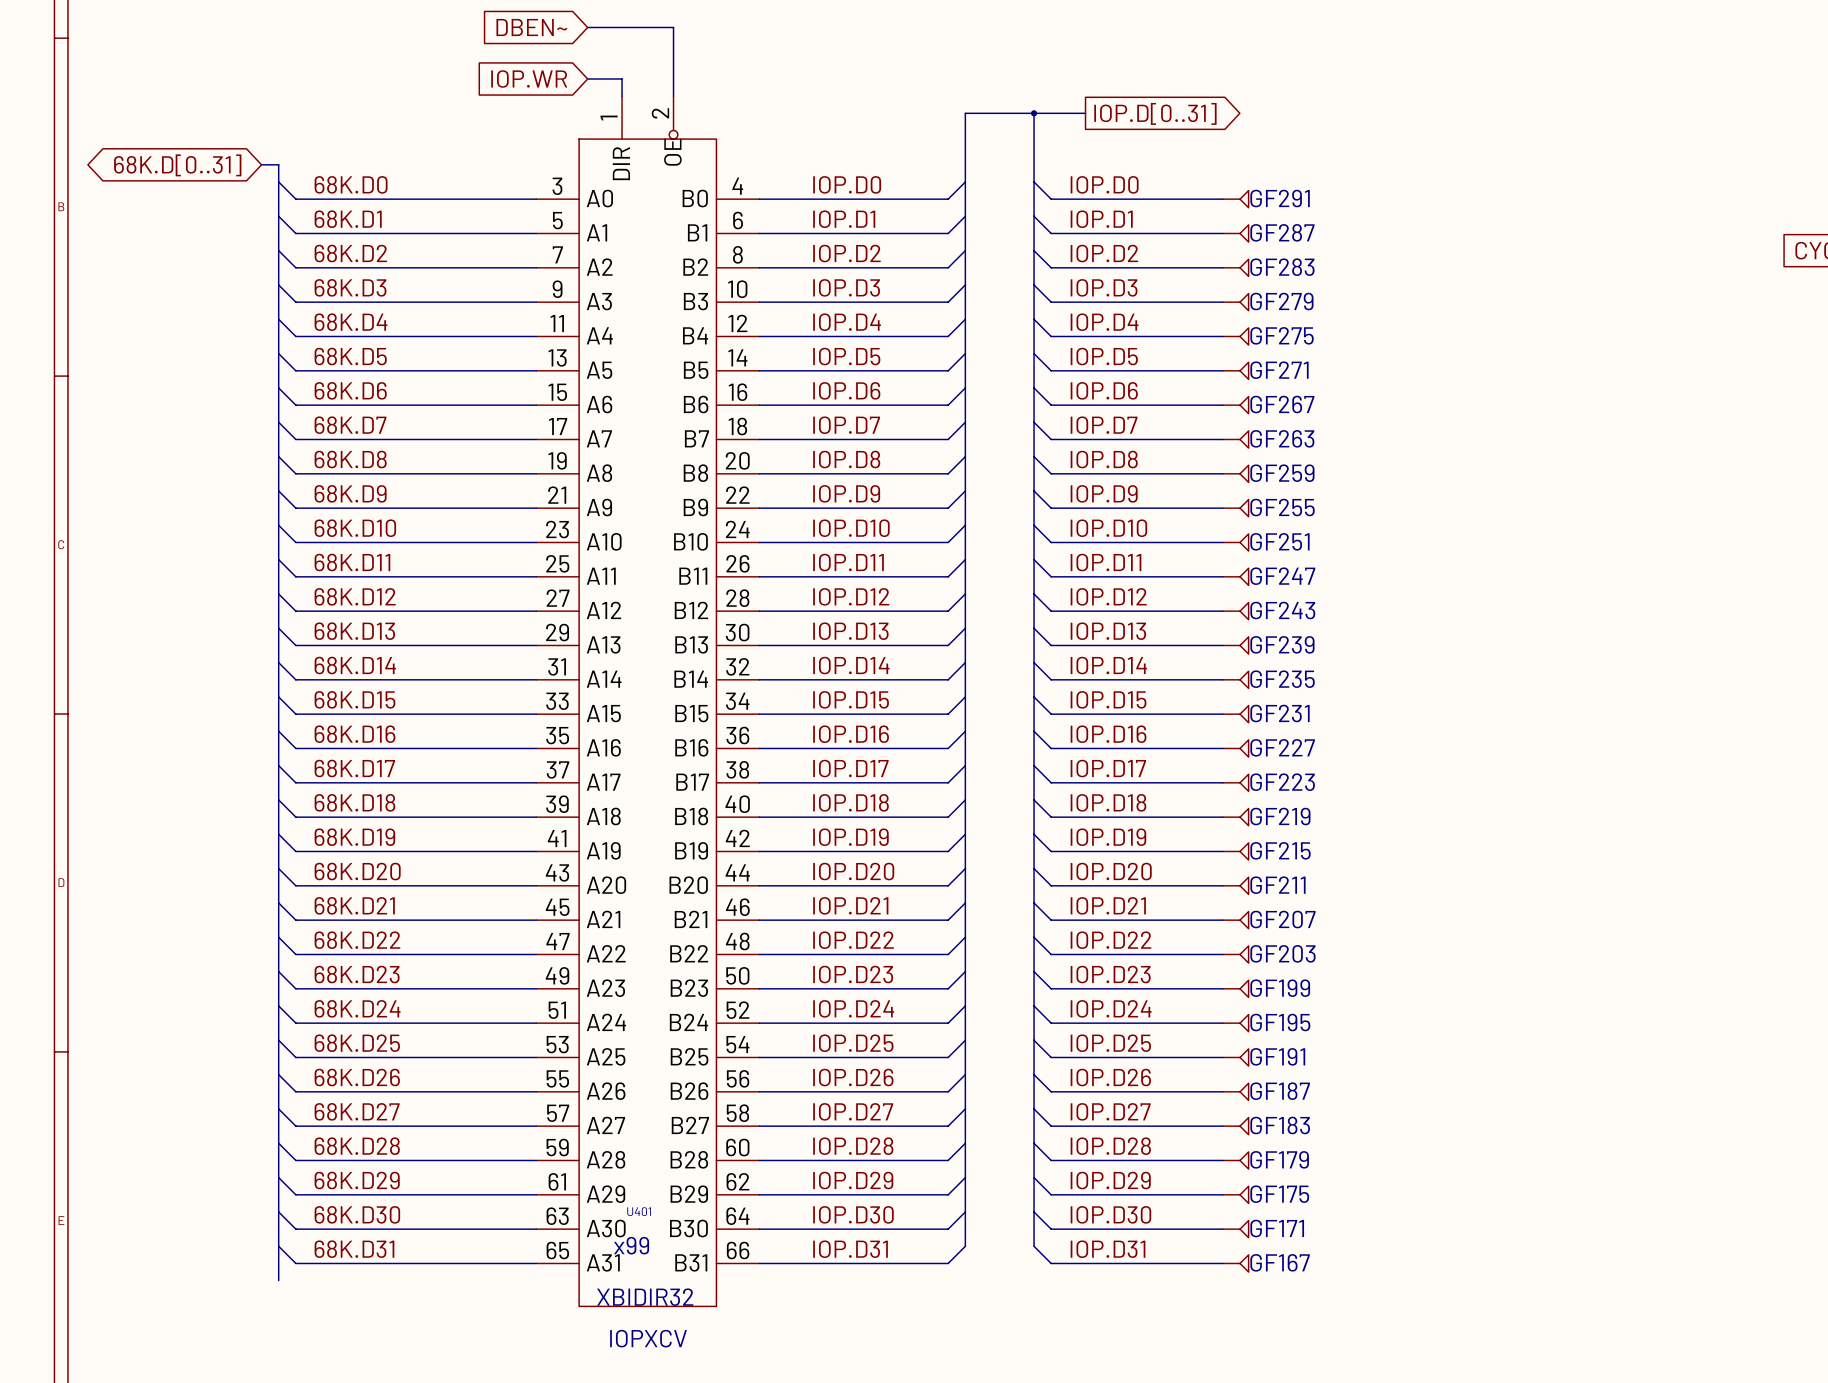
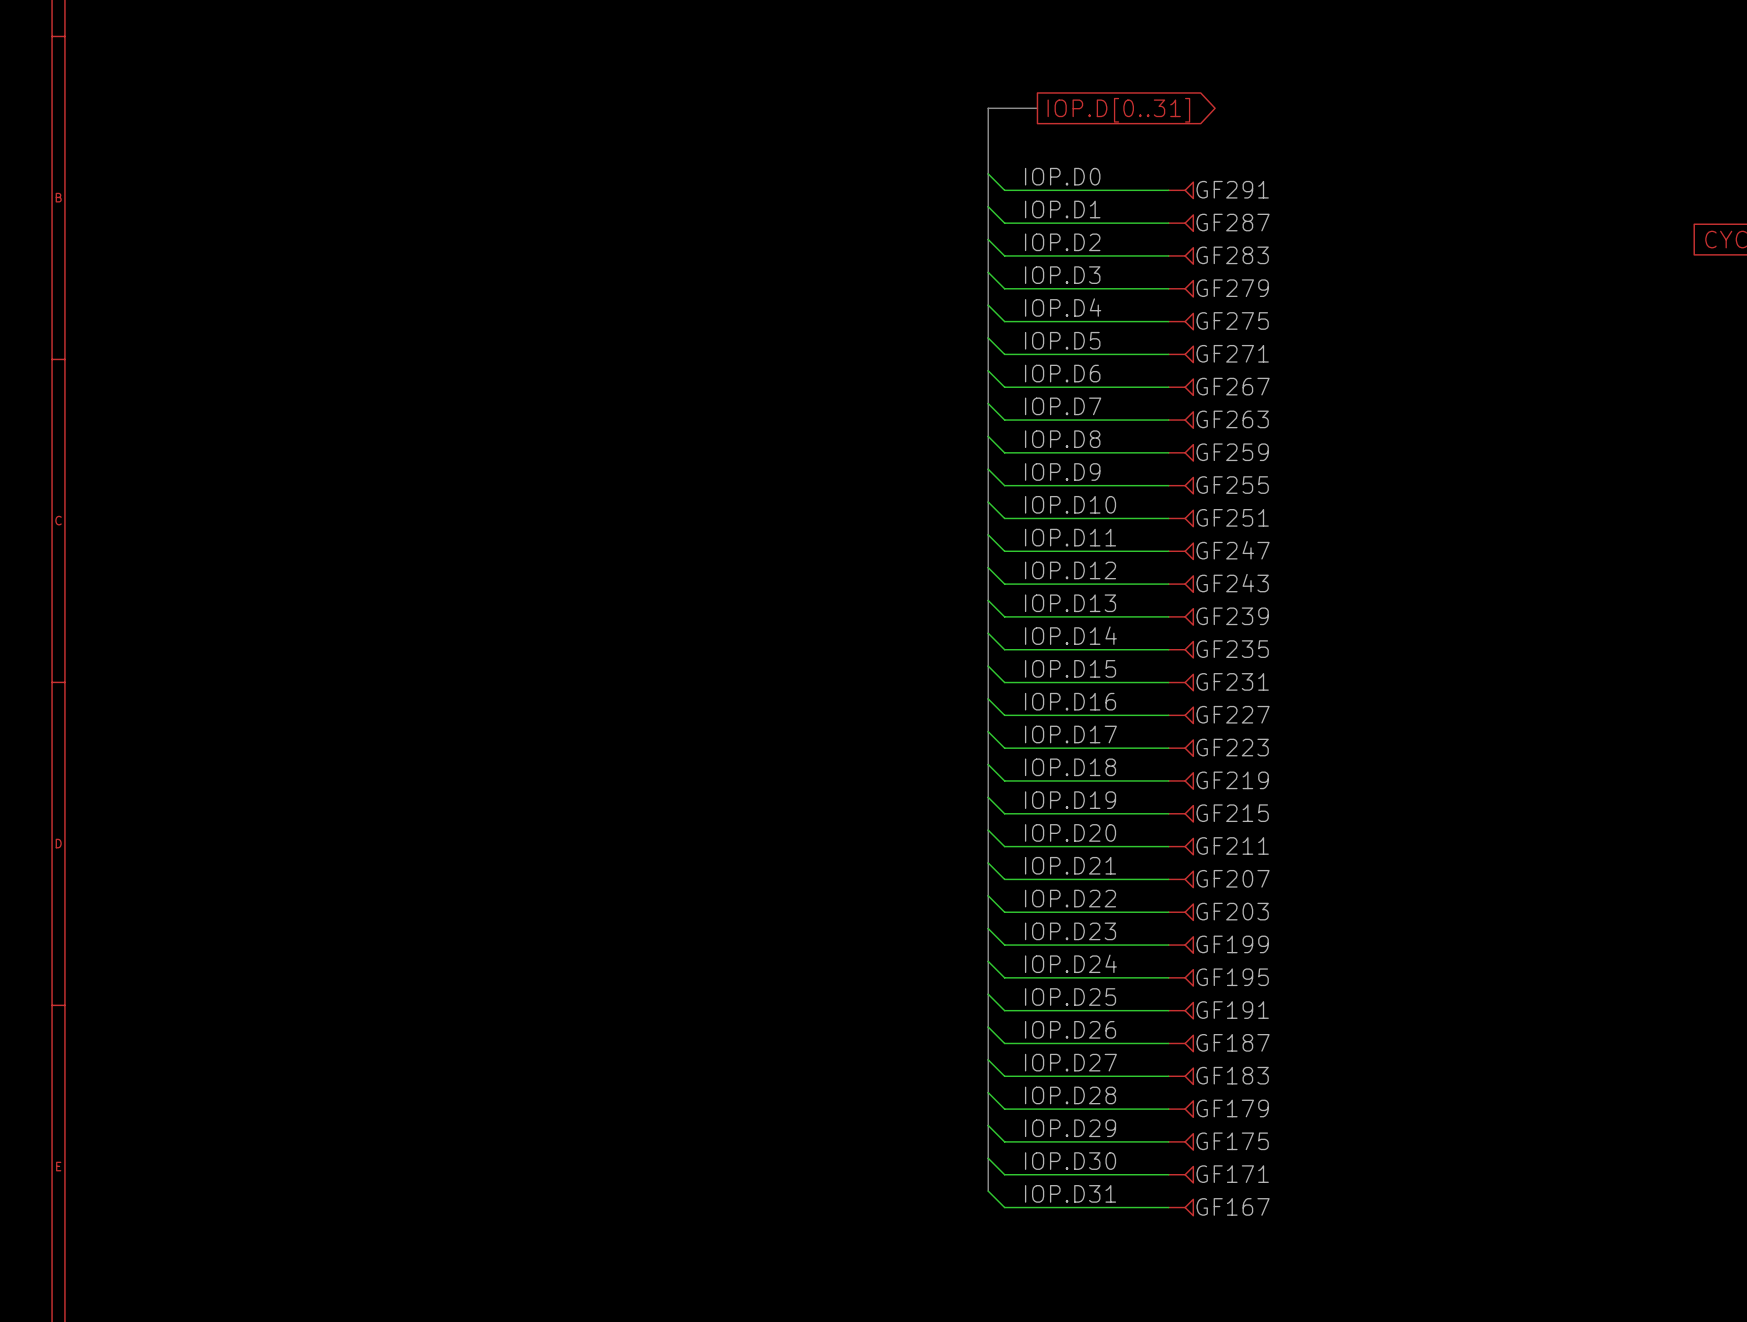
global label: DBEN~ (531, 27) -> none
wire: (587, 27) (673, 27) (673, 96) -> none
global label: IOP.WR (529, 78) -> none
wire: (587, 78) (622, 78) (622, 96) -> none
bus: (1034, 113) (965, 113) (965, 1246) -> none
junction: (1034, 113) -> none
bus: (261, 164) (278, 164) (278, 1280) -> none
global label: 68K.D[0..31] (177, 165) -> none
wire: (278, 181) (295, 199) (536, 199) -> none
wire: (965, 181) (948, 199) (759, 199) -> none
label: 68K.D0 (351, 184) -> none
label: IOP.D0 (847, 184) -> none
wire: (278, 216) (295, 233) (536, 233) -> none
wire: (965, 216) (948, 233) (759, 233) -> none
label: 68K.D1 (348, 219) -> none
label: IOP.D1 (844, 219) -> none
wire: (278, 250) (295, 267) (536, 267) -> none
wire: (965, 250) (948, 267) (759, 267) -> none
label: 68K.D2 (350, 253) -> none
label: IOP.D2 (846, 253) -> none
wire: (278, 284) (295, 302) (536, 302) -> none
wire: (965, 284) (948, 302) (759, 302) -> none
label: 68K.D3 (350, 287) -> none
label: IOP.D3 (846, 287) -> none
wire: (278, 319) (295, 336) (536, 336) -> none
wire: (965, 319) (948, 336) (759, 336) -> none
label: 68K.D4 (351, 322) -> none
label: IOP.D4 (847, 322) -> none
wire: (278, 353) (295, 370) (536, 370) -> none
wire: (965, 353) (948, 370) (759, 370) -> none
label: 68K.D5 (350, 356) -> none
label: IOP.D5 (846, 356) -> none
wire: (278, 387) (295, 405) (536, 405) -> none
wire: (965, 387) (948, 405) (759, 405) -> none
label: 68K.D6 (350, 390) -> none
label: IOP.D6 (846, 390) -> none
wire: (278, 422) (295, 439) (536, 439) -> none
wire: (965, 422) (948, 439) (759, 439) -> none
label: 68K.D7 (350, 425) -> none
label: IOP.D7 (846, 425) -> none
wire: (278, 456) (295, 473) (536, 473) -> none
wire: (965, 456) (948, 473) (759, 473) -> none
label: 68K.D8 (350, 459) -> none
label: IOP.D8 (846, 459) -> none
wire: (278, 490) (295, 508) (536, 508) -> none
wire: (965, 490) (948, 508) (759, 508) -> none
label: 68K.D9 (350, 493) -> none
label: IOP.D9 (846, 493) -> none
wire: (278, 525) (295, 542) (536, 542) -> none
wire: (965, 525) (948, 542) (759, 542) -> none
label: 68K.D10 (355, 528) -> none
label: IOP.D10 (851, 528) -> none
wire: (278, 559) (295, 576) (536, 576) -> none
wire: (965, 559) (948, 576) (759, 576) -> none
label: 68K.D11 (352, 562) -> none
label: IOP.D11 (848, 562) -> none
wire: (278, 593) (295, 611) (536, 611) -> none
wire: (965, 593) (948, 611) (759, 611) -> none
label: 68K.D12 (355, 596) -> none
label: IOP.D12 (851, 596) -> none
wire: (278, 628) (295, 645) (536, 645) -> none
wire: (965, 628) (948, 645) (759, 645) -> none
label: 68K.D13 (354, 631) -> none
label: IOP.D13 (850, 631) -> none
wire: (278, 662) (295, 679) (536, 679) -> none
wire: (965, 662) (948, 679) (759, 679) -> none
label: 68K.D14 (355, 665) -> none
label: IOP.D14 (851, 665) -> none
wire: (278, 696) (295, 714) (536, 714) -> none
wire: (965, 696) (948, 714) (759, 714) -> none
label: 68K.D15 (354, 699) -> none
label: IOP.D15 (851, 699) -> none
U401: XBIDIR32 (647, 701) -> none
wire: (278, 731) (295, 748) (536, 748) -> none
wire: (965, 731) (948, 748) (759, 748) -> none
label: 68K.D16 (355, 734) -> none
label: IOP.D16 (851, 734) -> none
wire: (278, 765) (295, 782) (536, 782) -> none
wire: (965, 765) (948, 782) (759, 782) -> none
label: 68K.D17 (354, 768) -> none
label: IOP.D17 (850, 768) -> none
wire: (278, 799) (295, 817) (536, 817) -> none
wire: (965, 799) (948, 817) (759, 817) -> none
label: 68K.D18 (354, 802) -> none
label: IOP.D18 (850, 802) -> none
wire: (278, 834) (295, 851) (536, 851) -> none
wire: (965, 834) (948, 851) (759, 851) -> none
label: 68K.D19 (354, 837) -> none
label: IOP.D19 (850, 837) -> none
wire: (278, 868) (295, 885) (536, 885) -> none
wire: (965, 868) (948, 885) (759, 885) -> none
label: 68K.D20 (357, 871) -> none
label: IOP.D20 (853, 871) -> none
wire: (278, 902) (295, 920) (536, 920) -> none
wire: (965, 902) (948, 920) (759, 920) -> none
label: 68K.D21 (354, 905) -> none
label: IOP.D21 (850, 905) -> none
wire: (278, 937) (295, 954) (536, 954) -> none
wire: (965, 937) (948, 954) (759, 954) -> none
label: 68K.D22 (357, 940) -> none
label: IOP.D22 (853, 940) -> none
wire: (278, 971) (295, 988) (536, 988) -> none
wire: (965, 971) (948, 988) (759, 988) -> none
label: 68K.D23 (357, 974) -> none
label: IOP.D23 (853, 974) -> none
wire: (278, 1005) (295, 1023) (536, 1023) -> none
wire: (965, 1005) (948, 1023) (759, 1023) -> none
label: 68K.D24 (357, 1008) -> none
label: IOP.D24 (853, 1008) -> none
wire: (278, 1040) (295, 1057) (536, 1057) -> none
wire: (965, 1040) (948, 1057) (759, 1057) -> none
label: 68K.D25 (357, 1043) -> none
label: IOP.D25 (853, 1043) -> none
wire: (278, 1074) (295, 1091) (536, 1091) -> none
wire: (965, 1074) (948, 1091) (759, 1091) -> none
label: 68K.D26 (357, 1077) -> none
label: IOP.D26 (853, 1077) -> none
wire: (278, 1108) (295, 1126) (536, 1126) -> none
wire: (965, 1108) (948, 1126) (759, 1126) -> none
label: 68K.D27 (357, 1111) -> none
label: IOP.D27 (853, 1111) -> none
wire: (278, 1143) (295, 1160) (536, 1160) -> none
wire: (965, 1143) (948, 1160) (759, 1160) -> none
label: 68K.D28 (357, 1146) -> none
label: IOP.D28 (853, 1146) -> none
wire: (278, 1177) (295, 1194) (536, 1194) -> none
wire: (965, 1177) (948, 1194) (759, 1194) -> none
label: 68K.D29 (357, 1180) -> none
label: IOP.D29 (853, 1180) -> none
wire: (278, 1211) (295, 1229) (536, 1229) -> none
wire: (965, 1211) (948, 1229) (759, 1229) -> none
label: 68K.D30 (357, 1214) -> none
label: IOP.D30 (853, 1214) -> none
wire: (278, 1246) (295, 1263) (536, 1263) -> none
wire: (965, 1246) (948, 1263) (759, 1263) -> none
label: 68K.D31 (354, 1249) -> none
label: IOP.D31 (850, 1249) -> none

